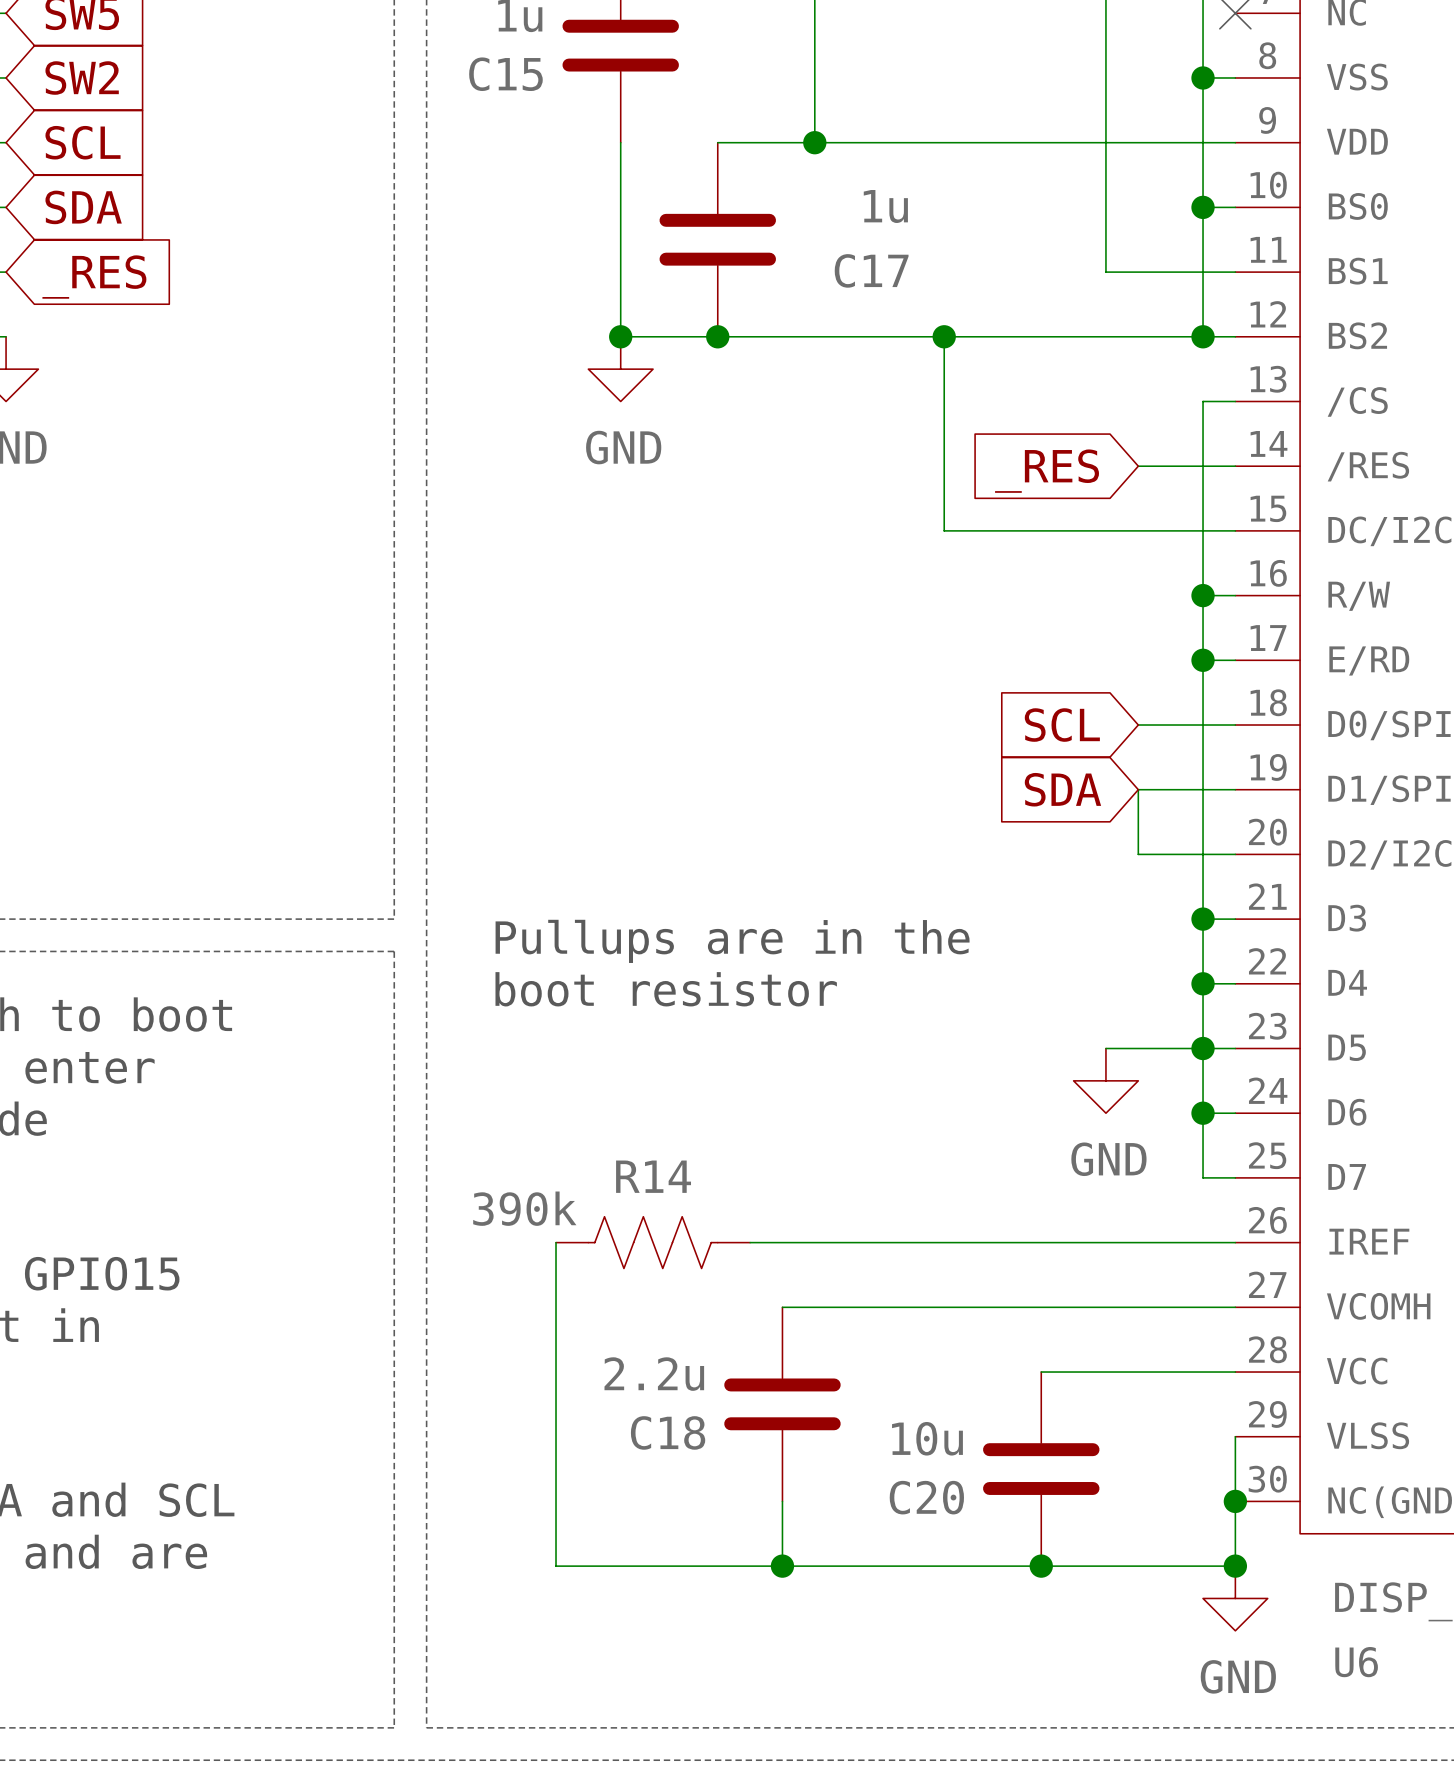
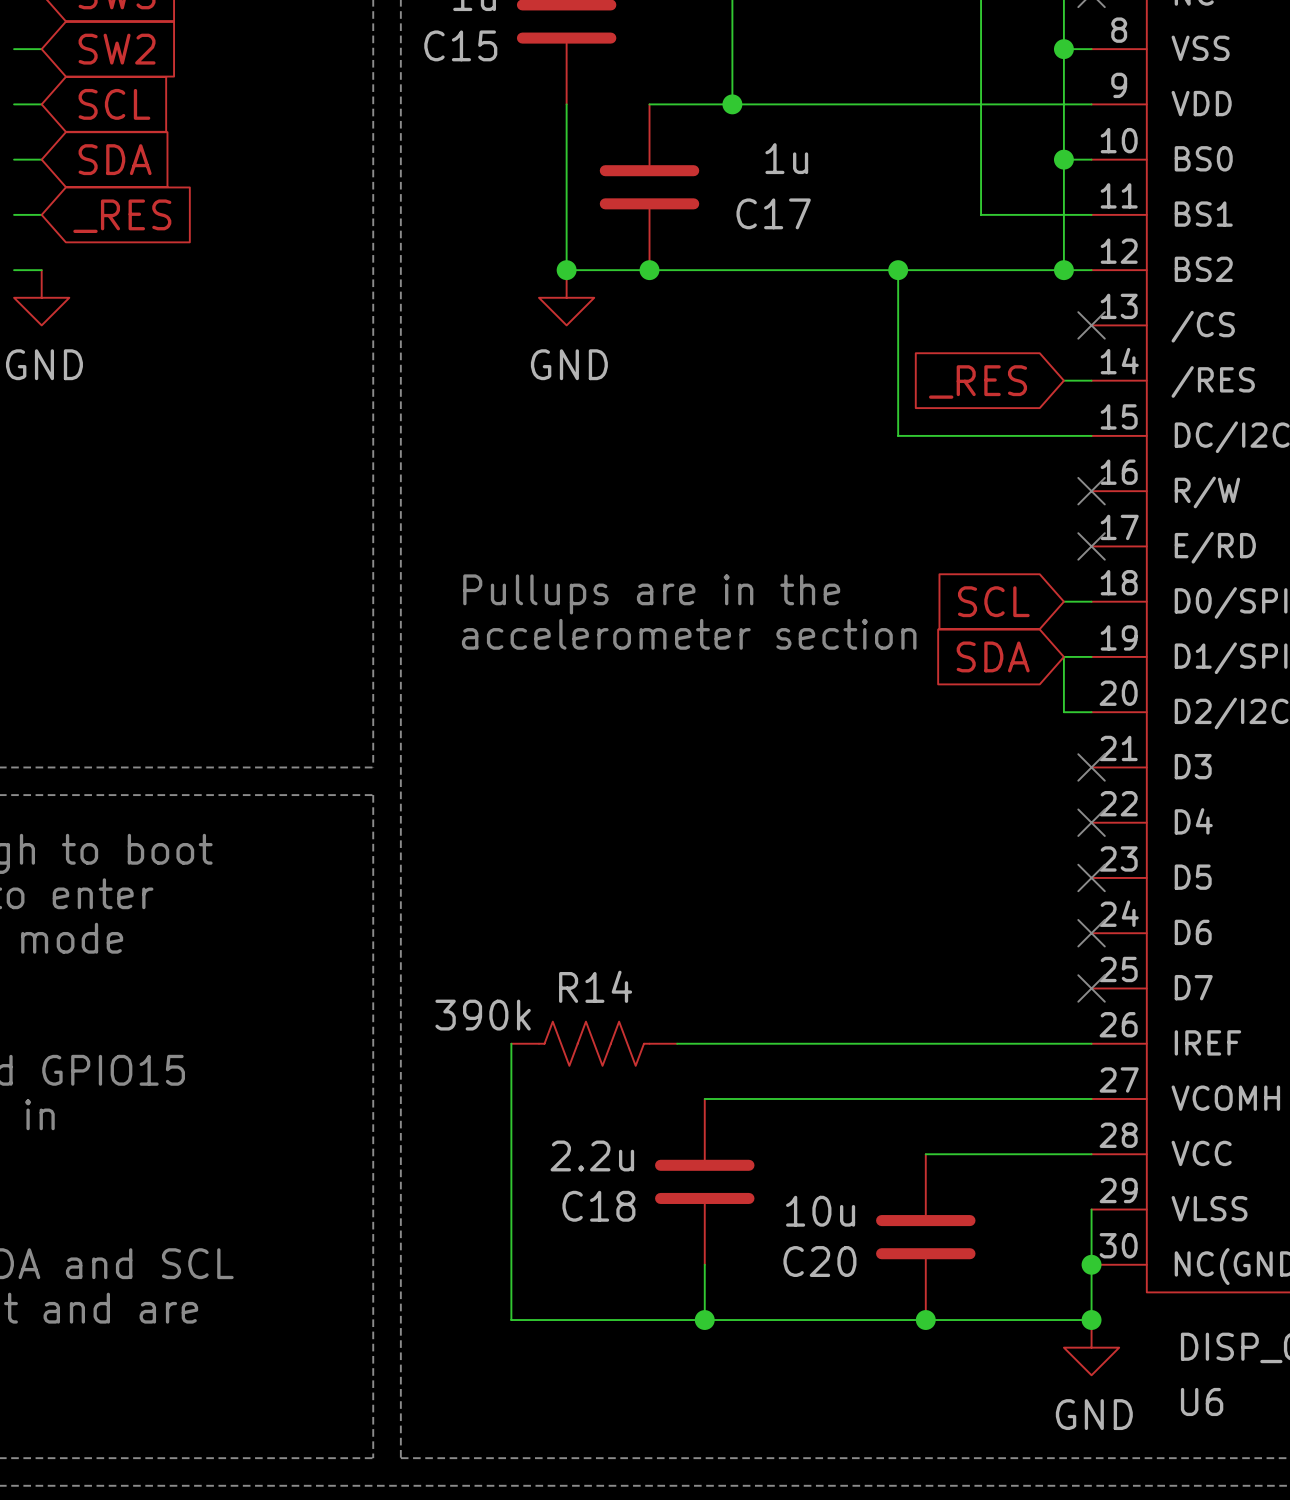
wire: (944, 336) (944, 530) (1008, 530) -> (898, 270) (898, 435)
junction position: (944, 336) -> (898, 270)
wire: (1235, 401) (1203, 401) (1203, 789) (1138, 789) (1138, 854) (1203, 854) (1203, 1177) (1235, 1177) -> none
no-connect mark: none -> (1091, 325)
wire: (1138, 466) (1203, 466) -> none
global label position: _RES (1047, 471) -> _RES (978, 381)
wire: (1203, 595) (1235, 595) -> none
junction: (1203, 595) -> none
no-connect mark: none -> (1091, 491)
wire: (1203, 660) (1235, 660) -> none
junction: (1203, 660) -> none
no-connect mark: none -> (1091, 546)
global label position: SCL (1062, 725) -> SCL (993, 601)
wire: (1138, 725) (1203, 725) -> none
text: none -> accelerometer section (689, 634)
global label position: SDA (1062, 789) -> SDA (993, 656)
wire: (1203, 919) (1235, 919) -> none
junction: (1203, 919) -> none
no-connect mark: none -> (1091, 767)
text position: Pullups are in the (732, 941) -> Pullups are in the (651, 594)
wire: (1203, 983) (1235, 983) -> none
junction: (1203, 983) -> none
no-connect mark: none -> (1091, 822)
text: boot resistor (666, 989) -> none
wire: (1105, 1048) (1235, 1048) -> none
junction: (1203, 1048) -> none
no-connect mark: none -> (1091, 877)
power symbol: GND (1105, 1080) -> none
wire: (1203, 1113) (1235, 1113) -> none
junction: (1203, 1113) -> none
no-connect mark: none -> (1091, 933)
no-connect mark: none -> (1091, 988)

